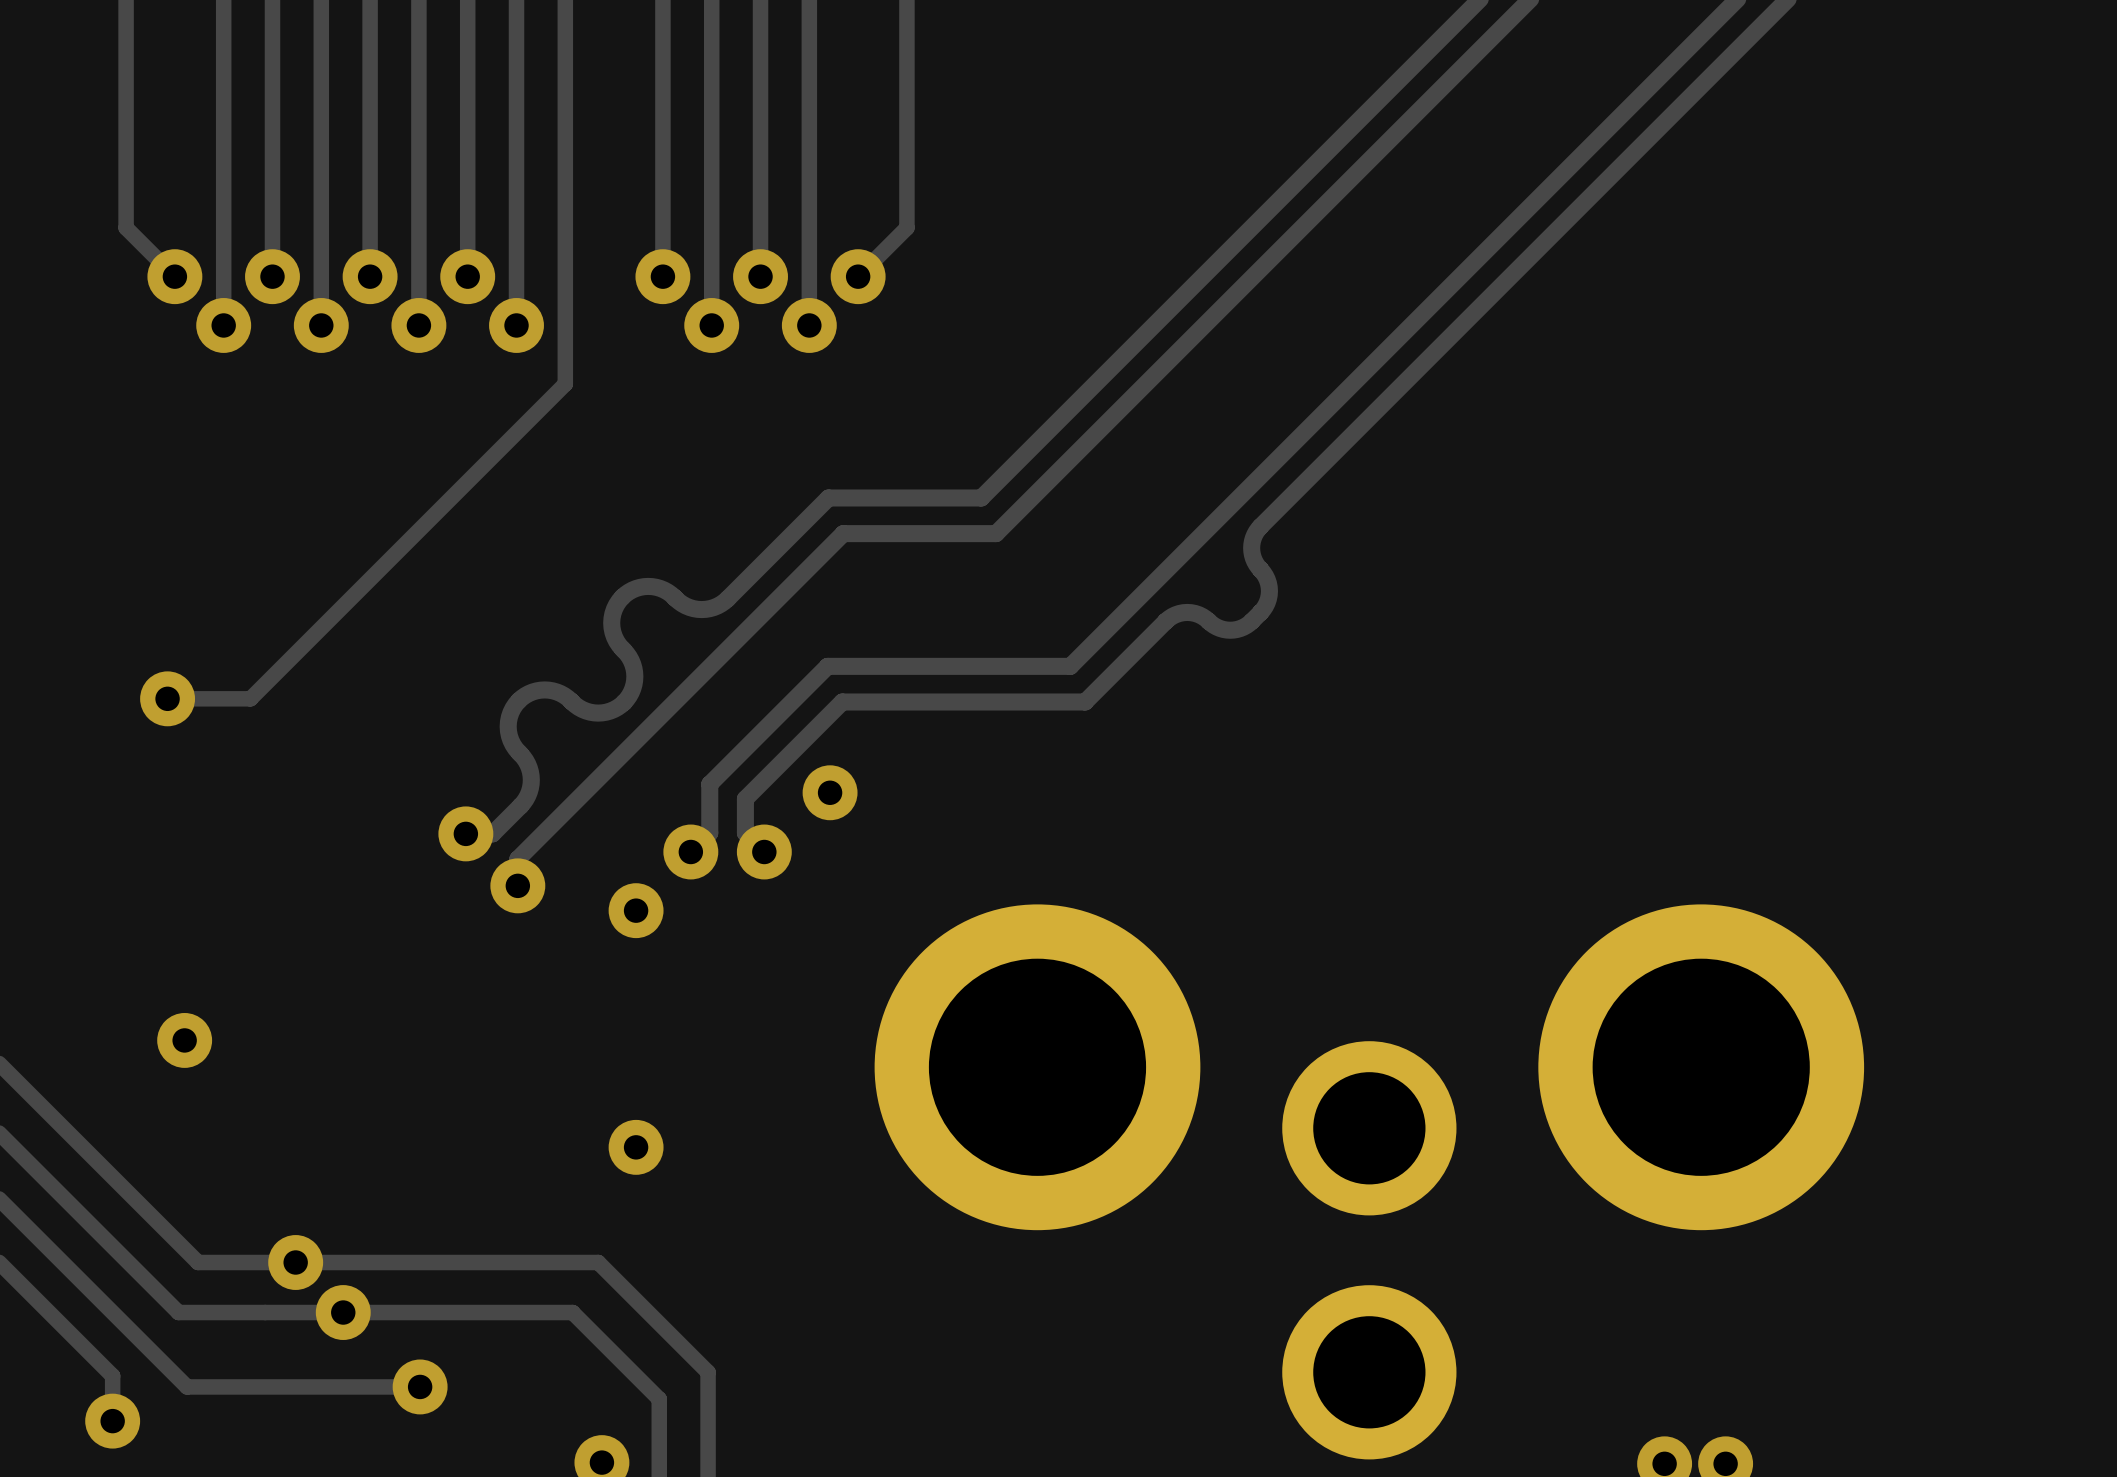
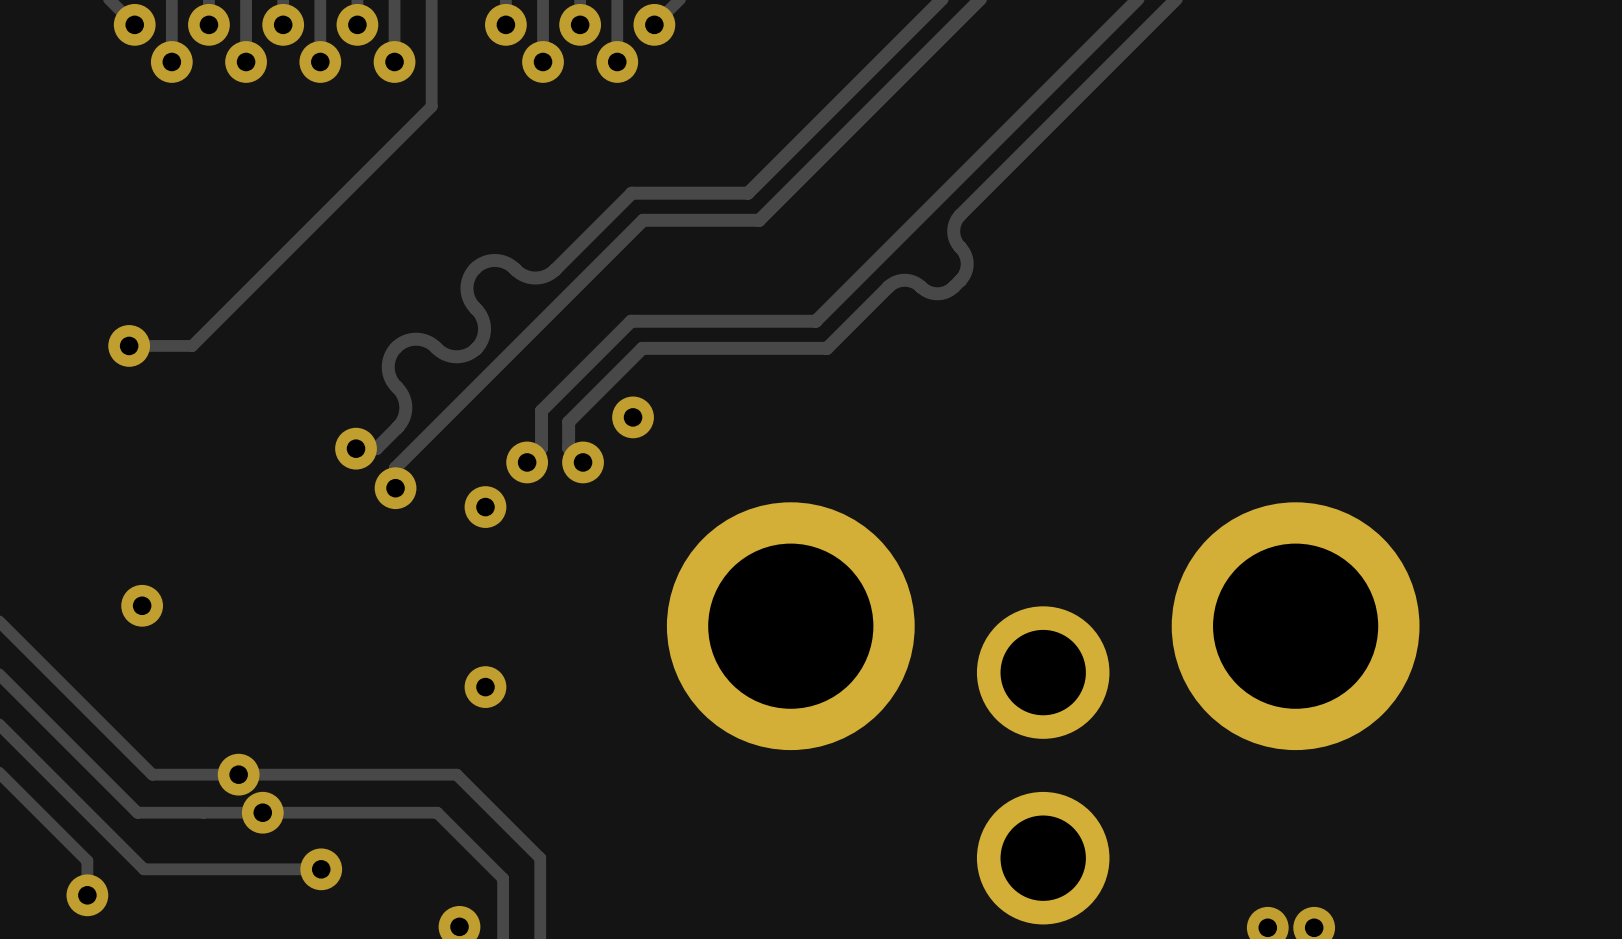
via position: (295, 1262) -> (238, 774)

